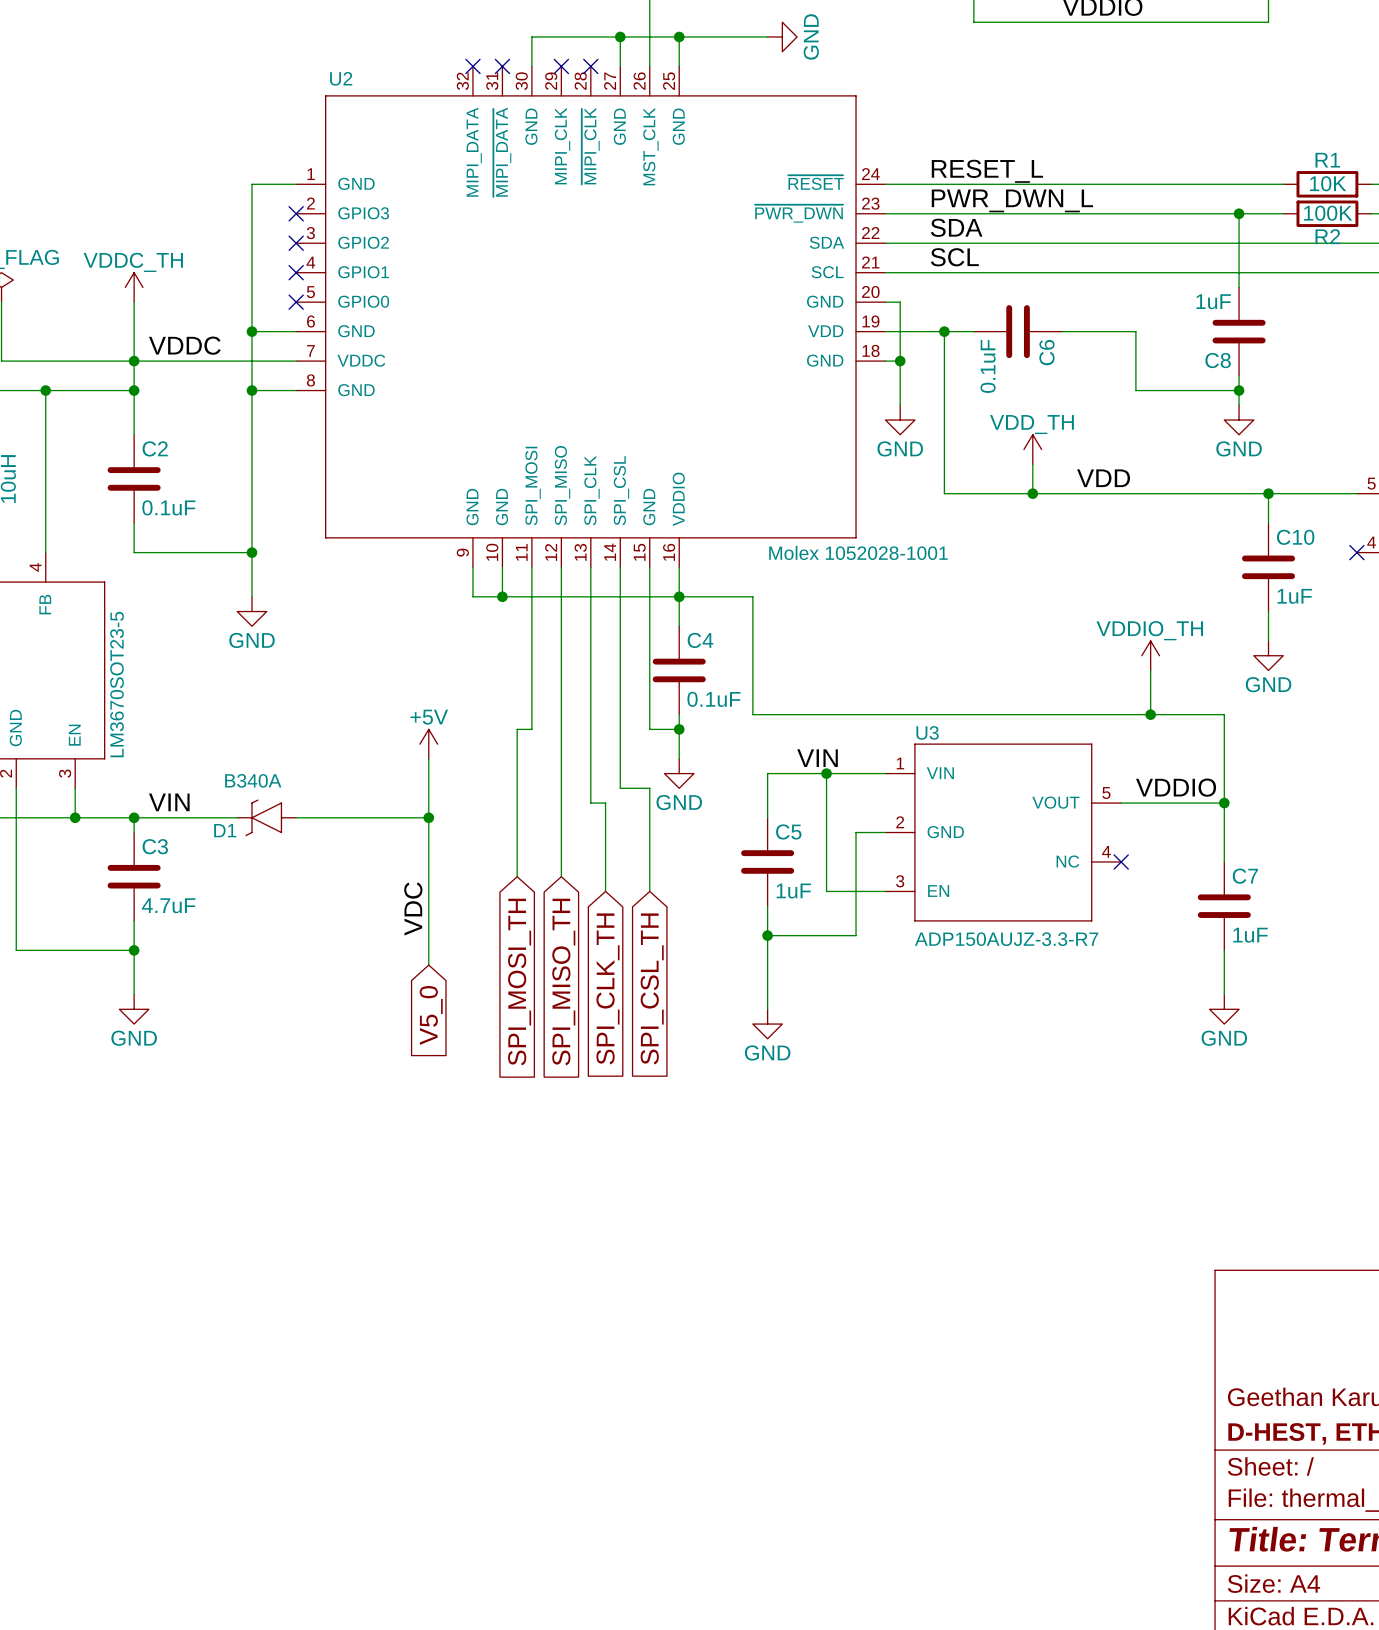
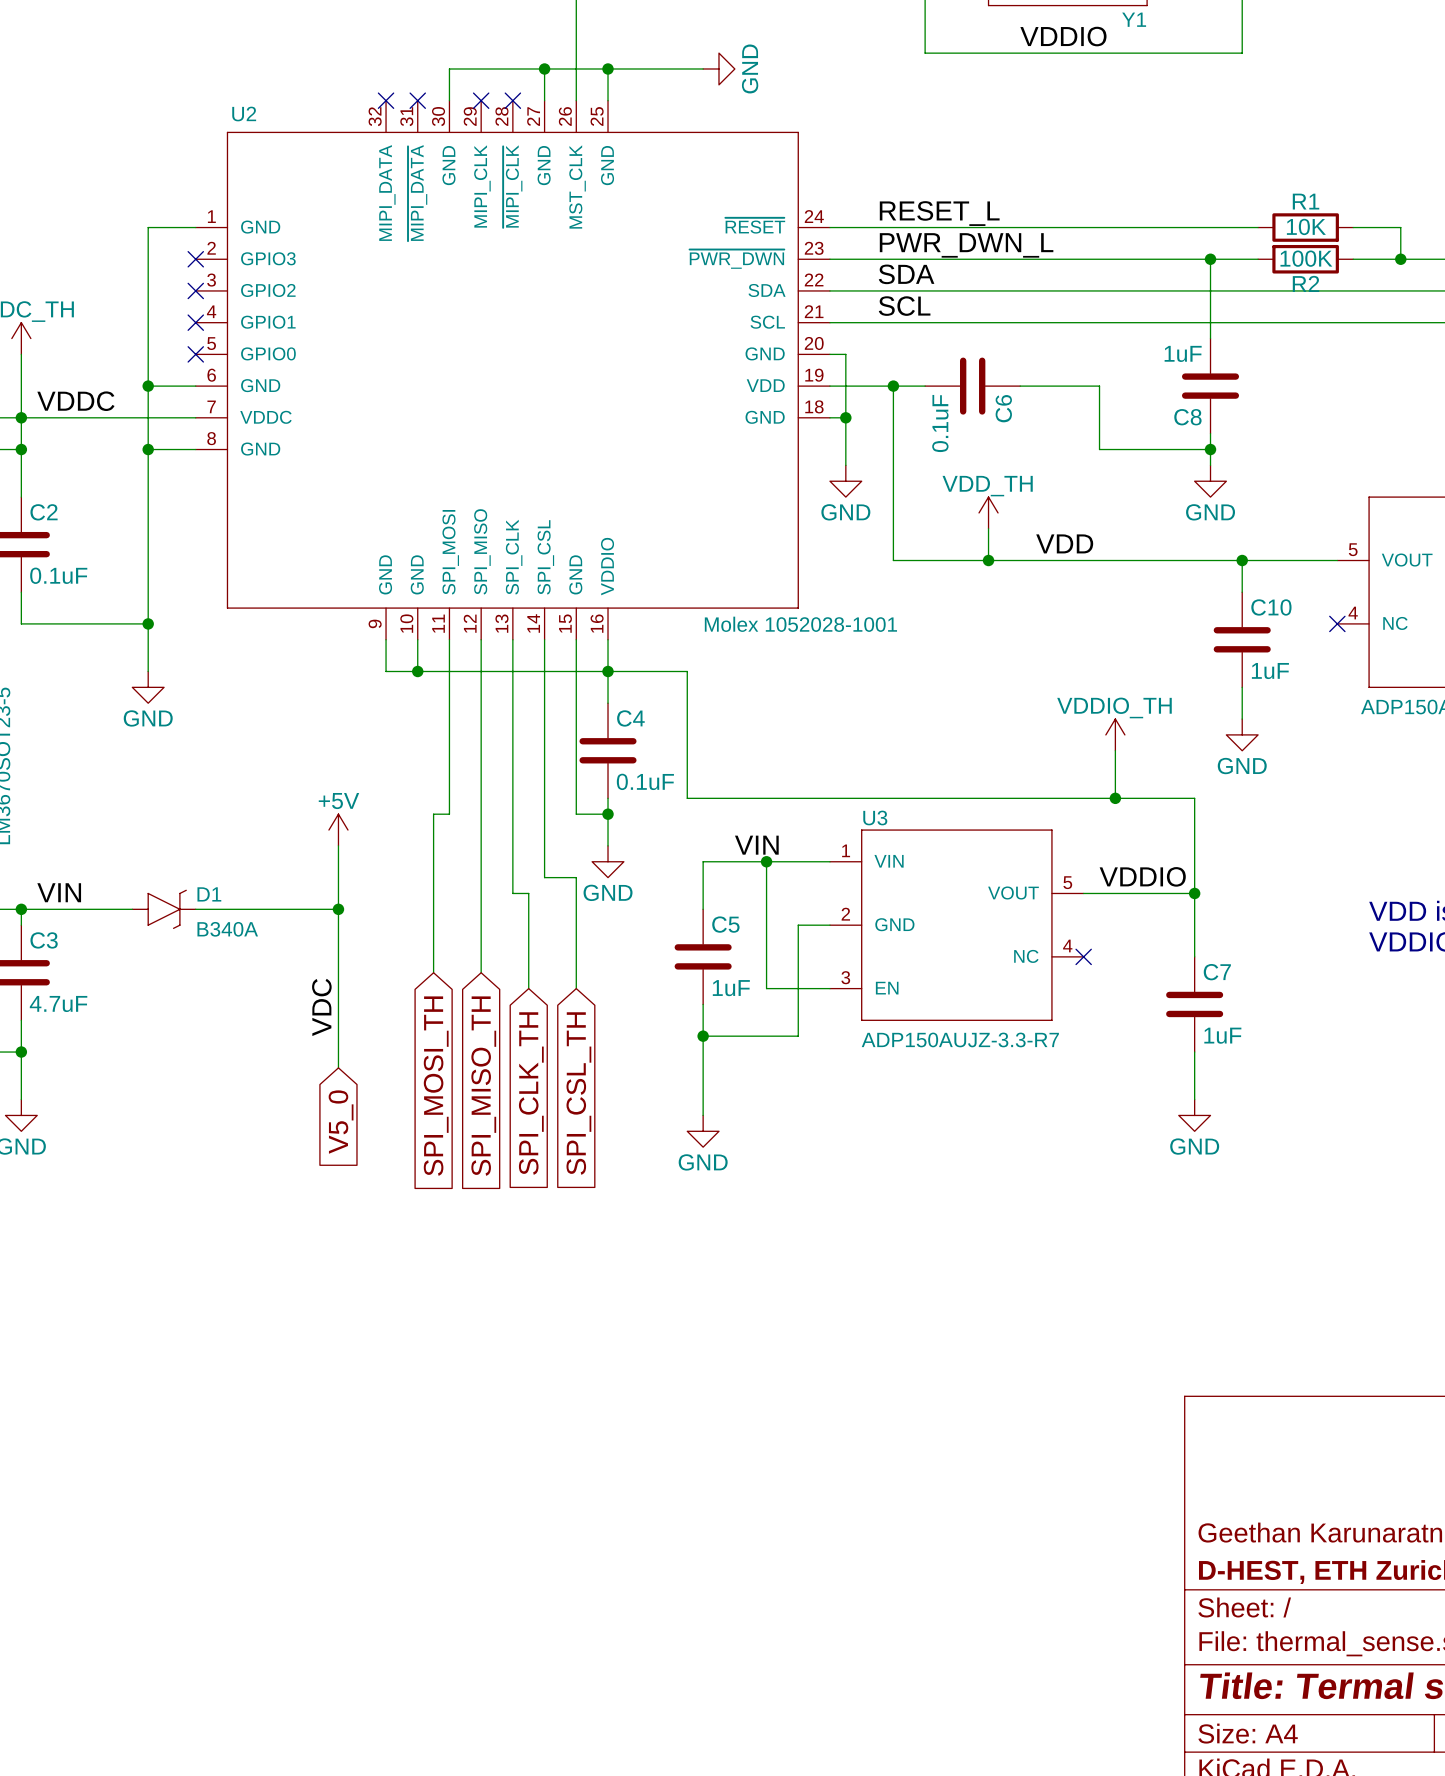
D1 value position: B340A (253, 780) -> B340A (227, 929)
D1 rotation: 0° (266, 817) -> 180° (164, 909)

